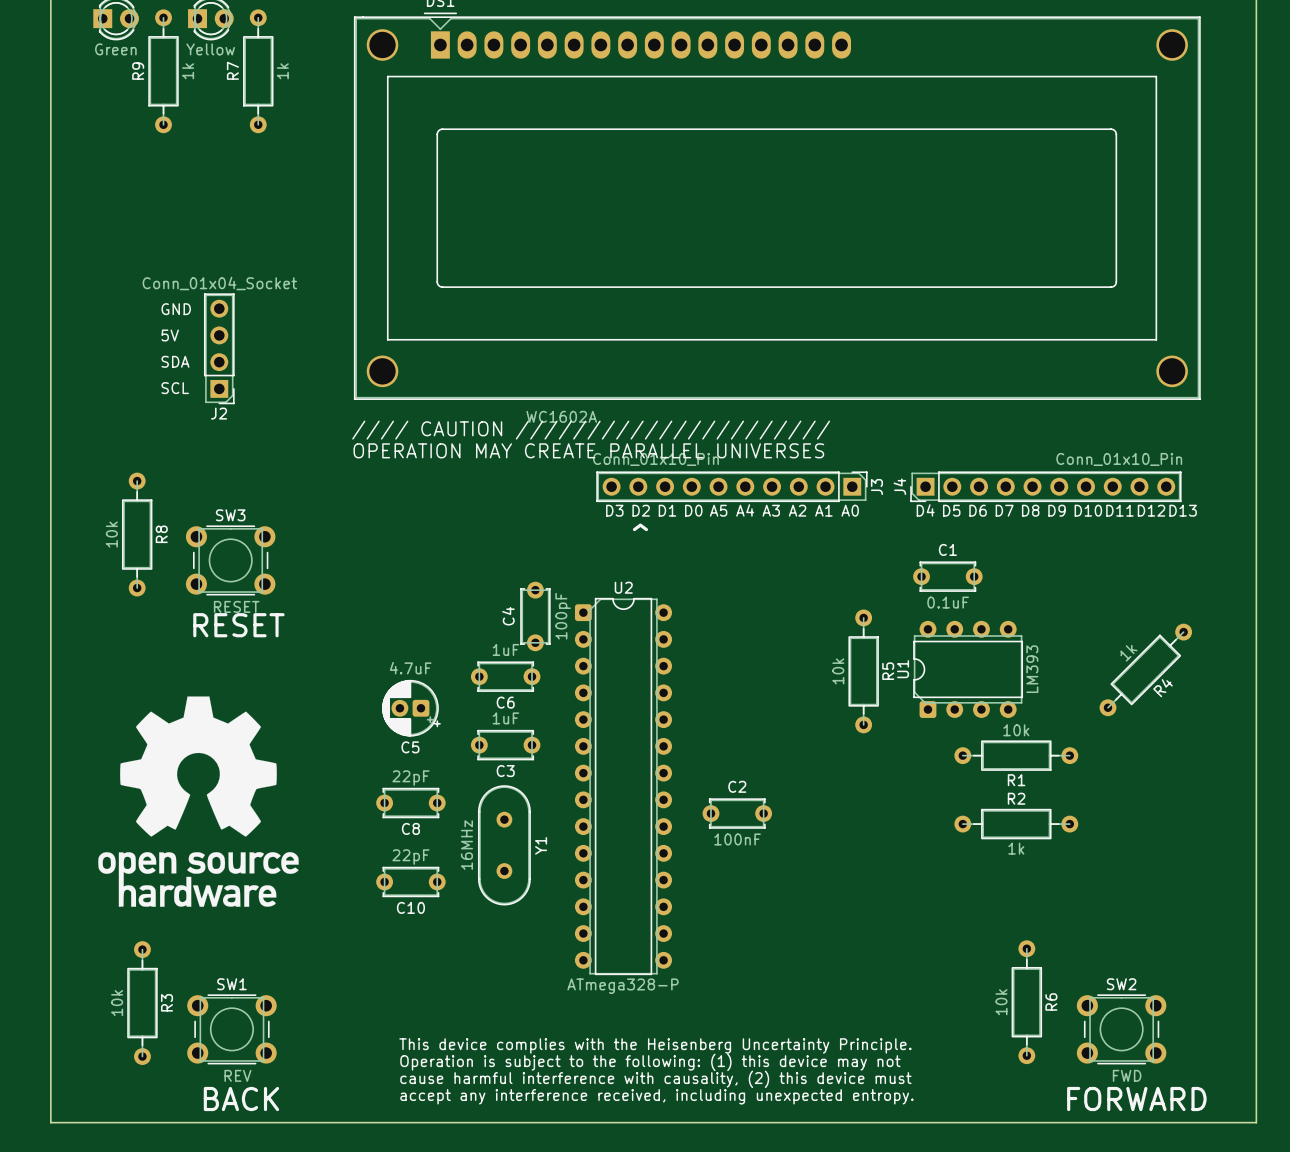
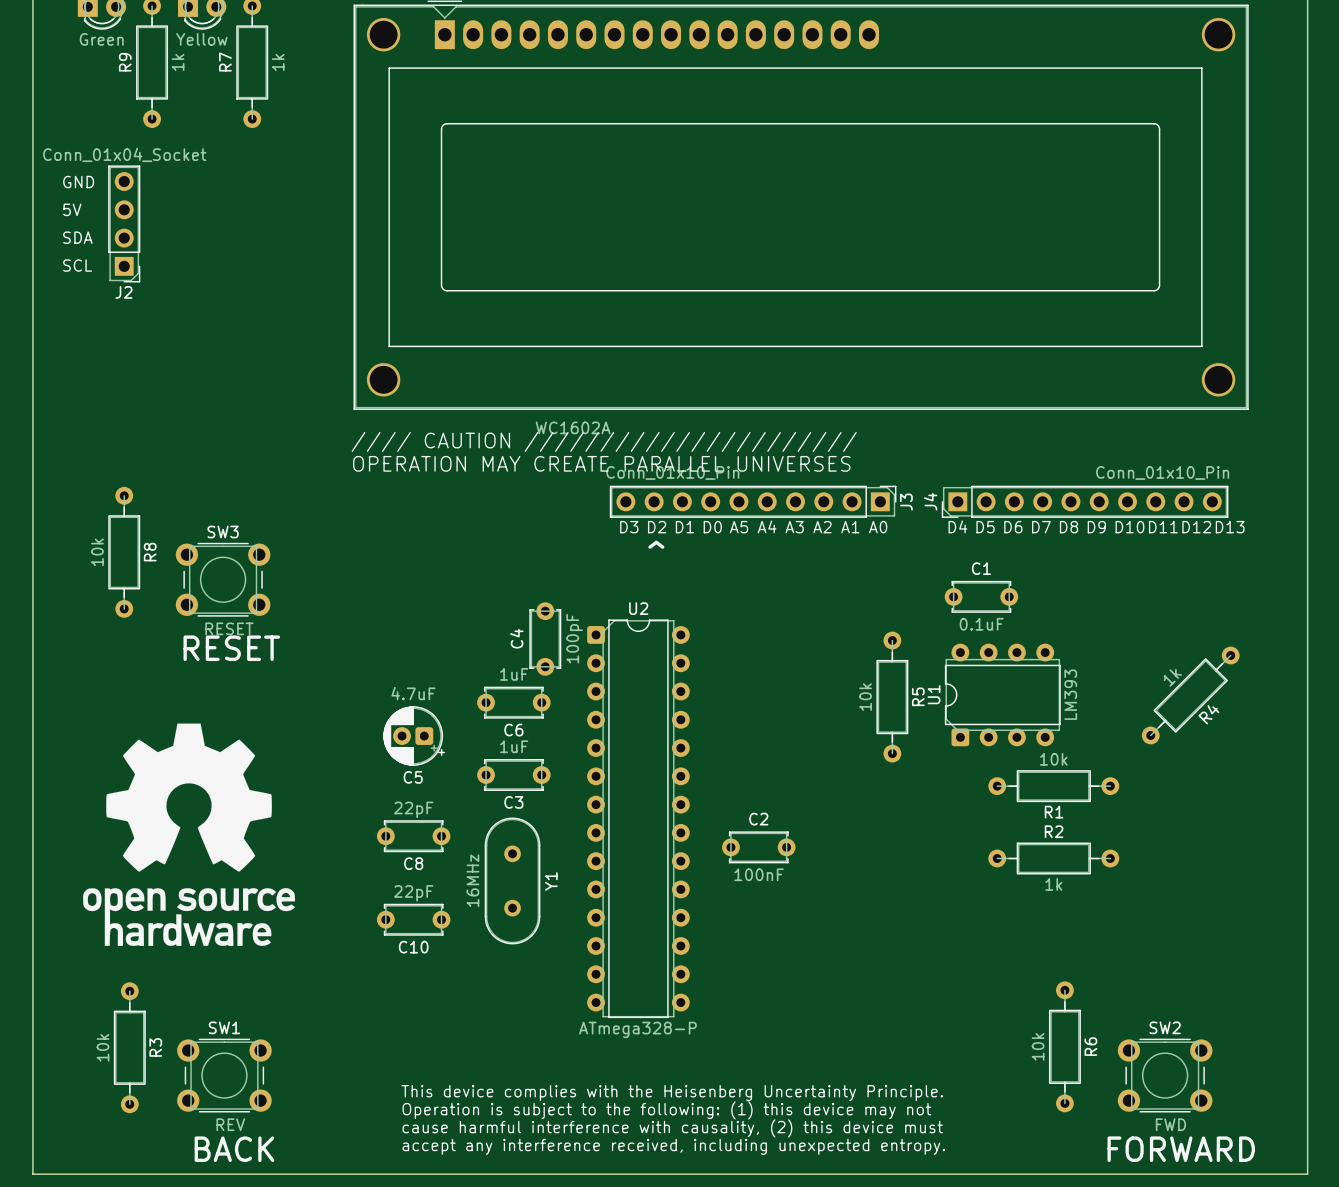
text position: GND (176, 309) -> GND (78, 182)
text position: 5V (170, 335) -> 5V (72, 209)
J2 position: (219, 348) -> (124, 223)
text position: SDA (175, 361) -> SDA (77, 237)
text position: SCL (175, 388) -> SCL (77, 265)

